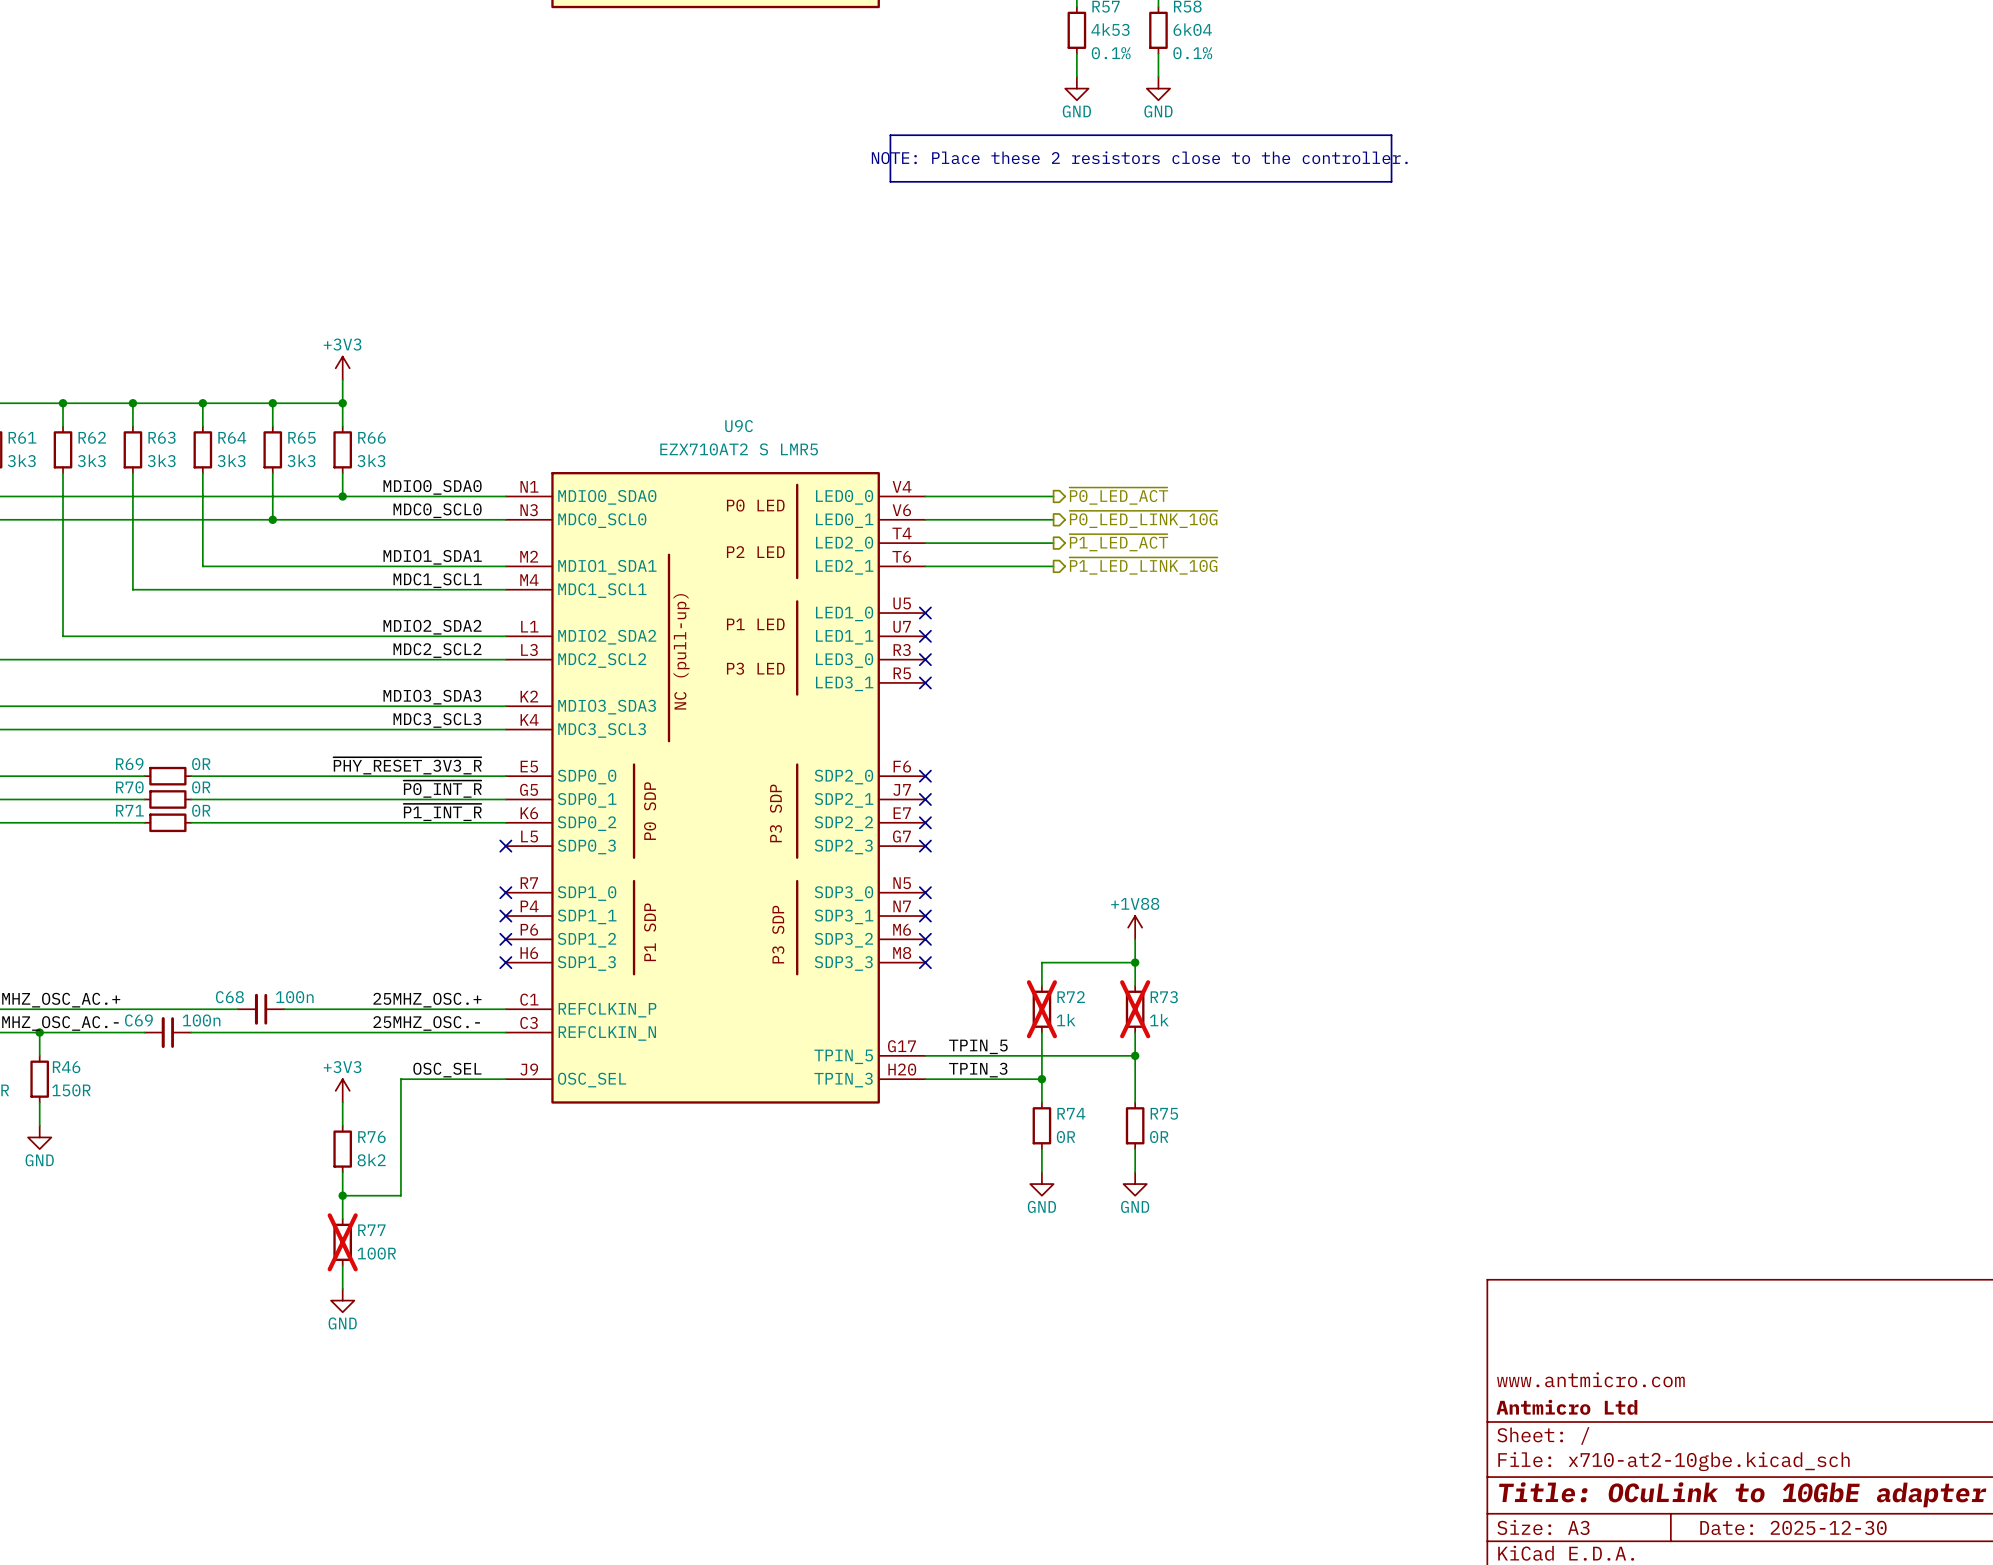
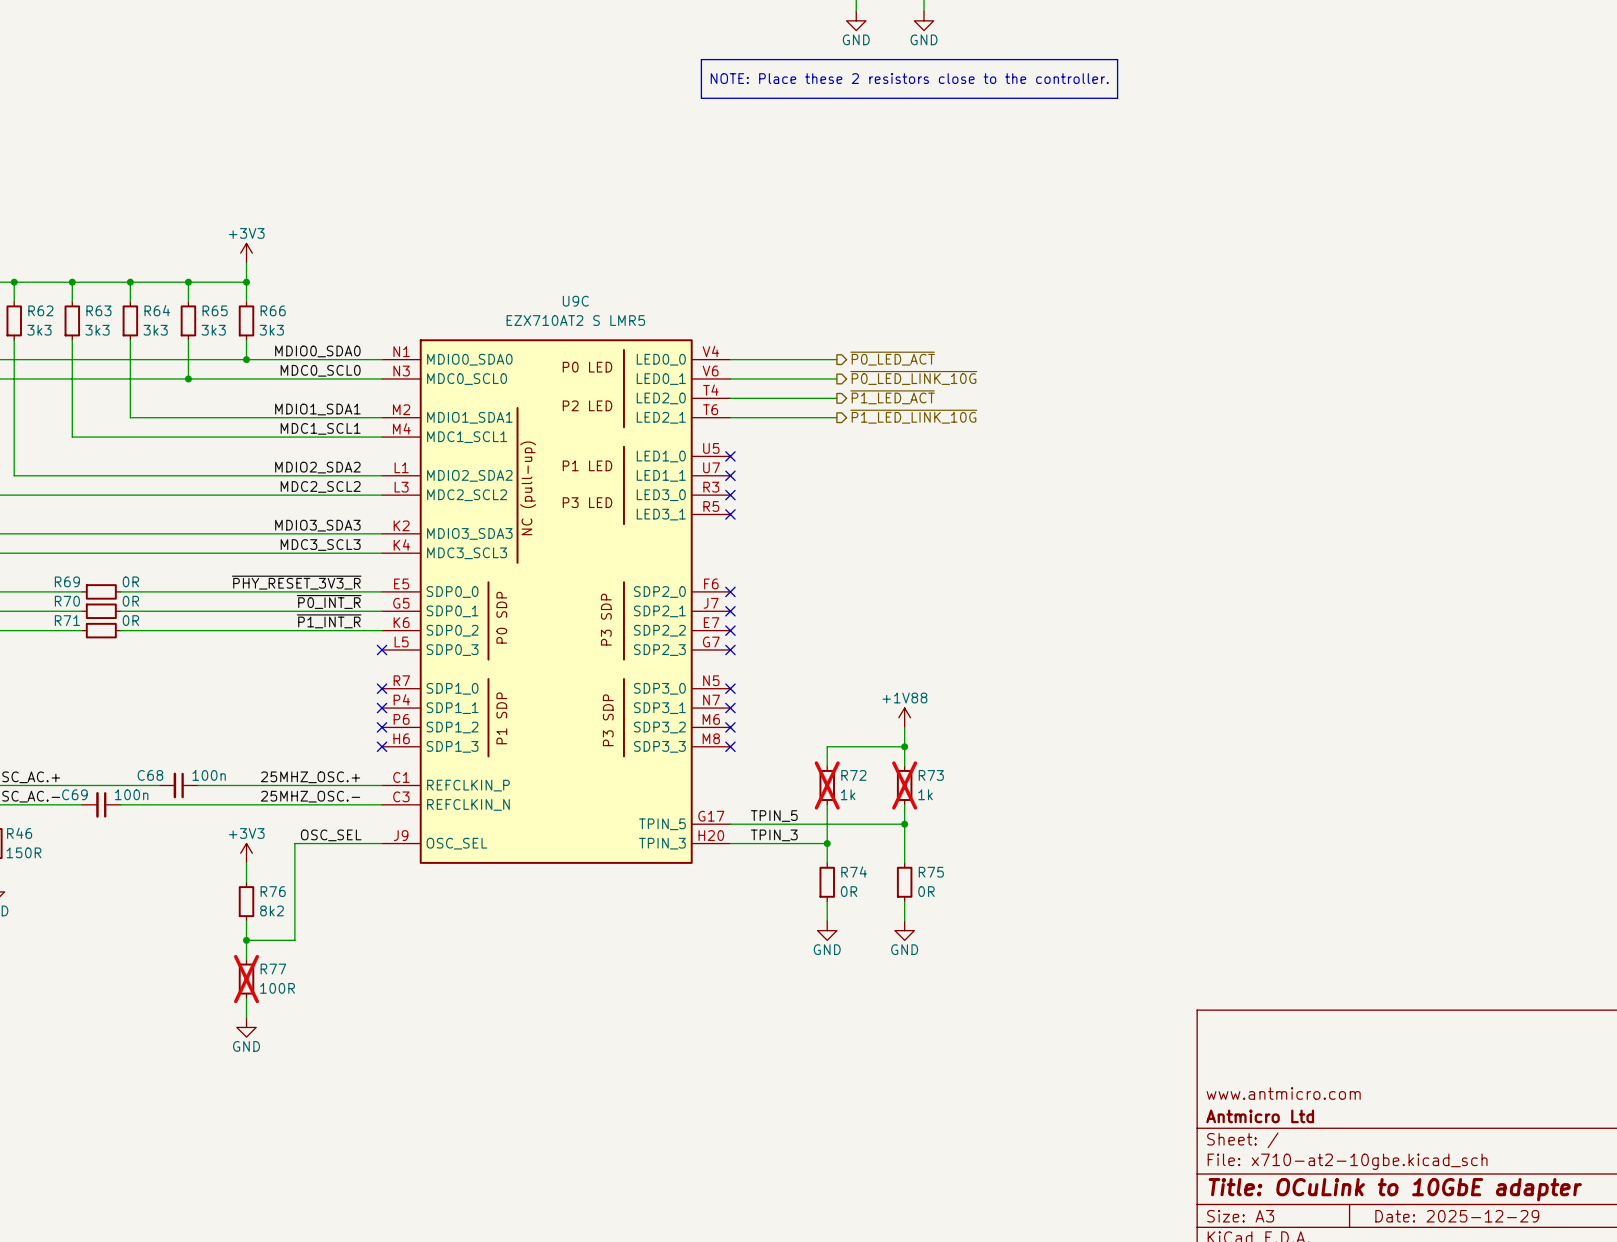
title block: Date: 2025-12-30 (1793, 1527) -> Date: 2025-12-29 (1457, 1216)

